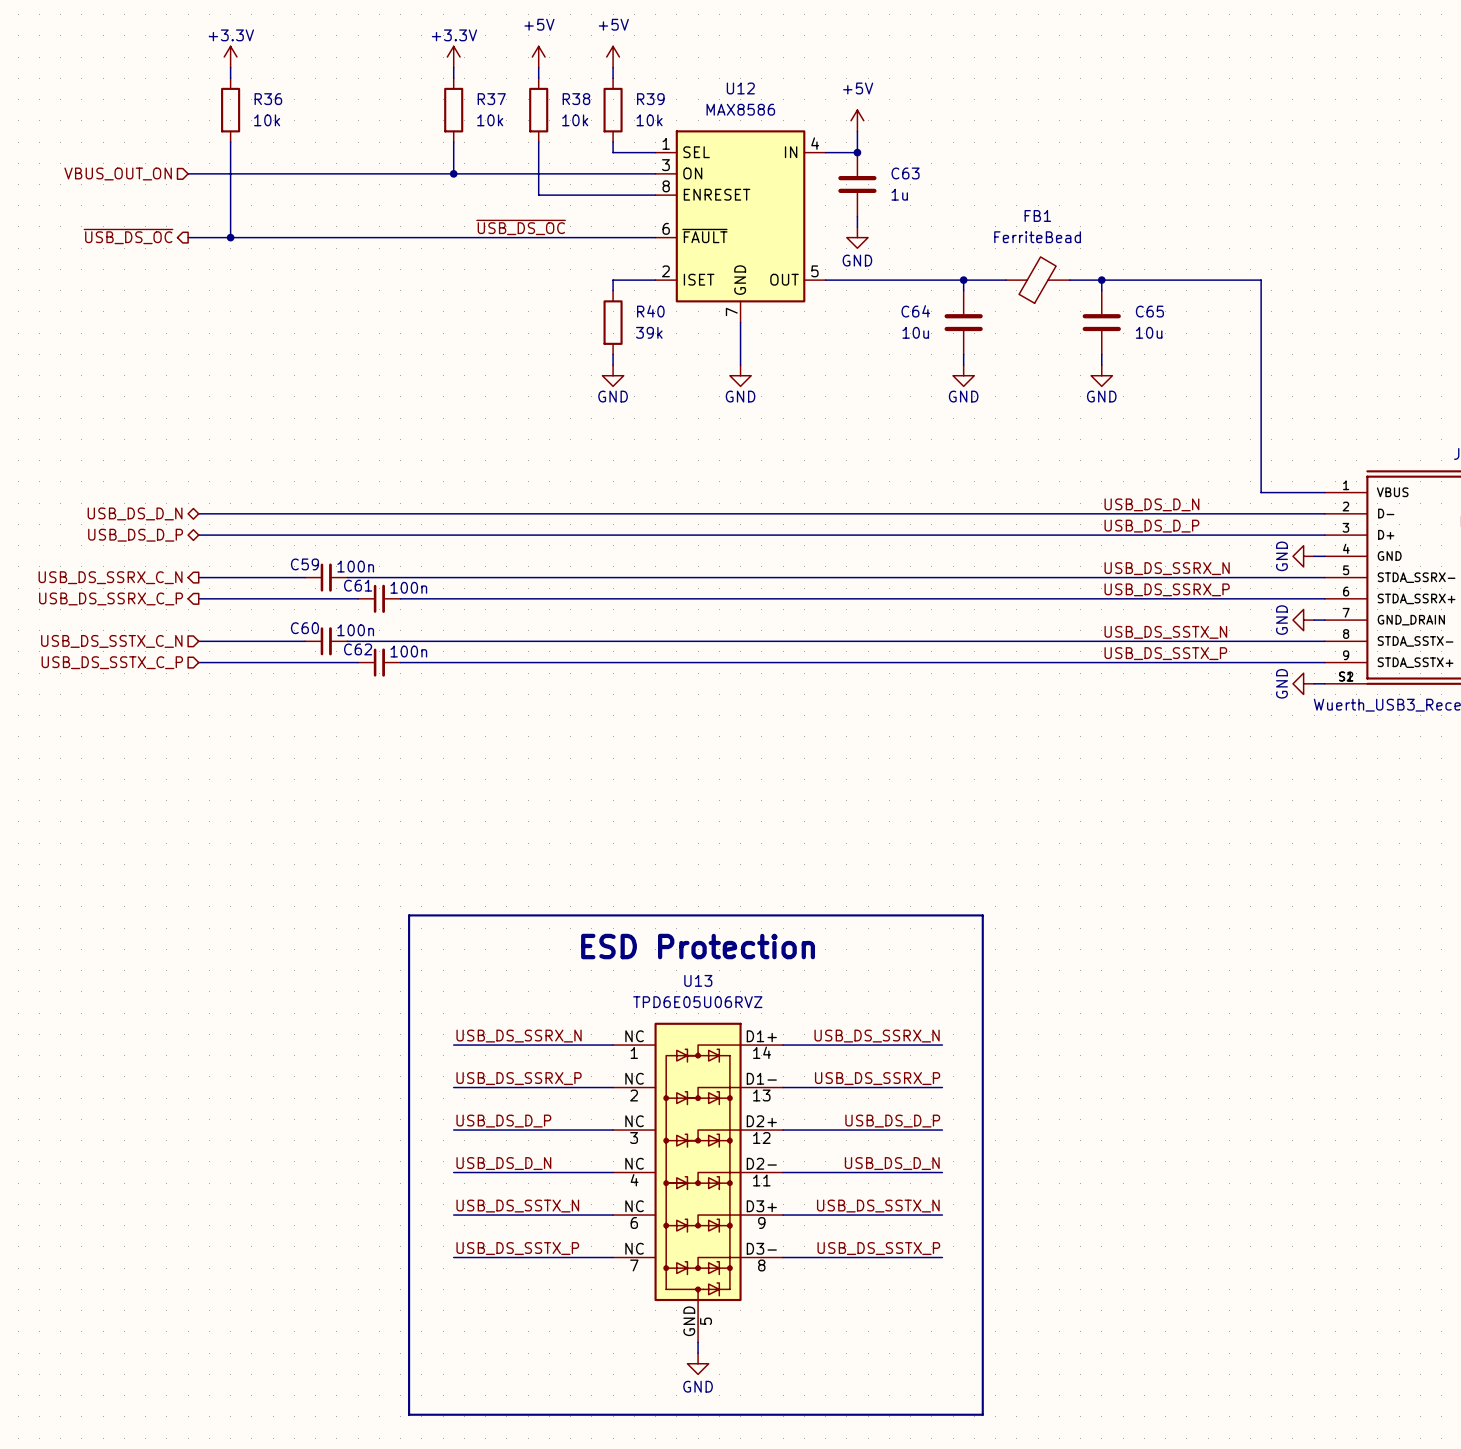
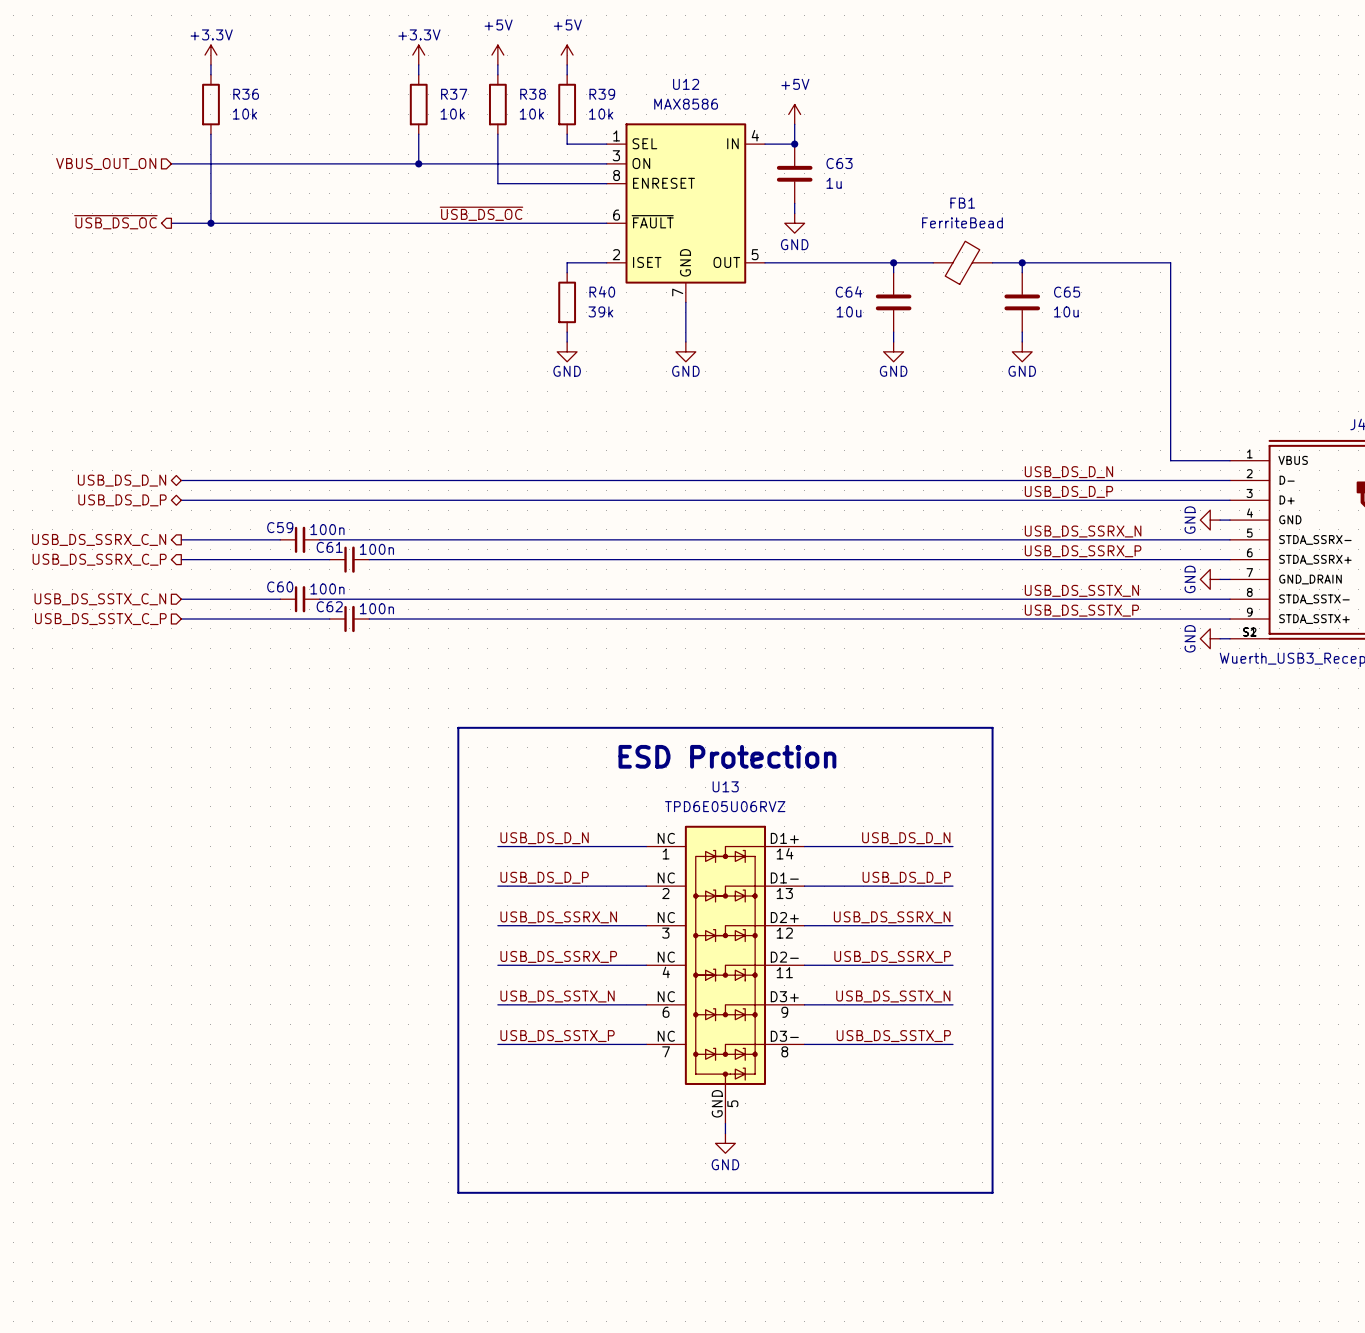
label: none -> USB_DS_D_N (544, 838)
label: none -> USB_DS_D_N (906, 838)
line: (409, 915) (982, 915) (982, 1414) (409, 1414) (409, 915) -> (458, 727) (992, 727) (992, 1192) (458, 1192) (458, 727)
text position: ESD Protection (698, 946) -> ESD Protection (727, 756)
label position: USB_DS_SSRX_N (519, 1036) -> USB_DS_SSRX_N (558, 917)
label position: USB_DS_SSRX_N (877, 1036) -> USB_DS_SSRX_N (892, 917)
wire: (453, 1045) (613, 1045) -> (497, 846) (646, 846)
wire: (783, 1045) (942, 1045) -> (804, 846) (952, 846)
wire: none -> (804, 1004) (952, 1004)
label position: USB_DS_SSRX_P (519, 1078) -> USB_DS_SSRX_P (558, 956)
label position: USB_DS_SSRX_P (877, 1078) -> USB_DS_SSRX_P (892, 956)
wire: (453, 1087) (613, 1087) -> (497, 886) (646, 886)
wire: (783, 1087) (942, 1087) -> (804, 886) (952, 886)
label position: USB_DS_D_P (503, 1121) -> USB_DS_D_P (544, 877)
label position: USB_DS_D_P (892, 1121) -> USB_DS_D_P (906, 877)
wire: (453, 1130) (613, 1130) -> (497, 925) (646, 925)
wire: (783, 1130) (942, 1130) -> (804, 925) (952, 925)
label: USB_DS_D_N (503, 1163) -> none
label: USB_DS_D_N (892, 1163) -> none
wire: (453, 1172) (613, 1172) -> (497, 965) (646, 965)
wire: (783, 1172) (942, 1172) -> (804, 965) (952, 965)
U13 position: (698, 1182) -> (725, 974)
label position: USB_DS_SSTX_N (517, 1206) -> USB_DS_SSTX_N (557, 996)
label position: USB_DS_SSTX_N (878, 1206) -> USB_DS_SSTX_N (893, 996)
wire: (453, 1215) (613, 1215) -> (497, 1004) (646, 1004)
wire: (783, 1215) (942, 1215) -> (725, 1133) (725, 1123)
label position: USB_DS_SSTX_P (517, 1248) -> USB_DS_SSTX_P (557, 1036)
label position: USB_DS_SSTX_P (878, 1248) -> USB_DS_SSTX_P (893, 1036)
wire: (453, 1257) (613, 1257) -> (497, 1044) (646, 1044)
wire: (783, 1257) (942, 1257) -> (804, 1044) (952, 1044)
wire: (698, 1342) (698, 1353) -> none
power symbol position: GND (698, 1363) -> GND (725, 1143)

